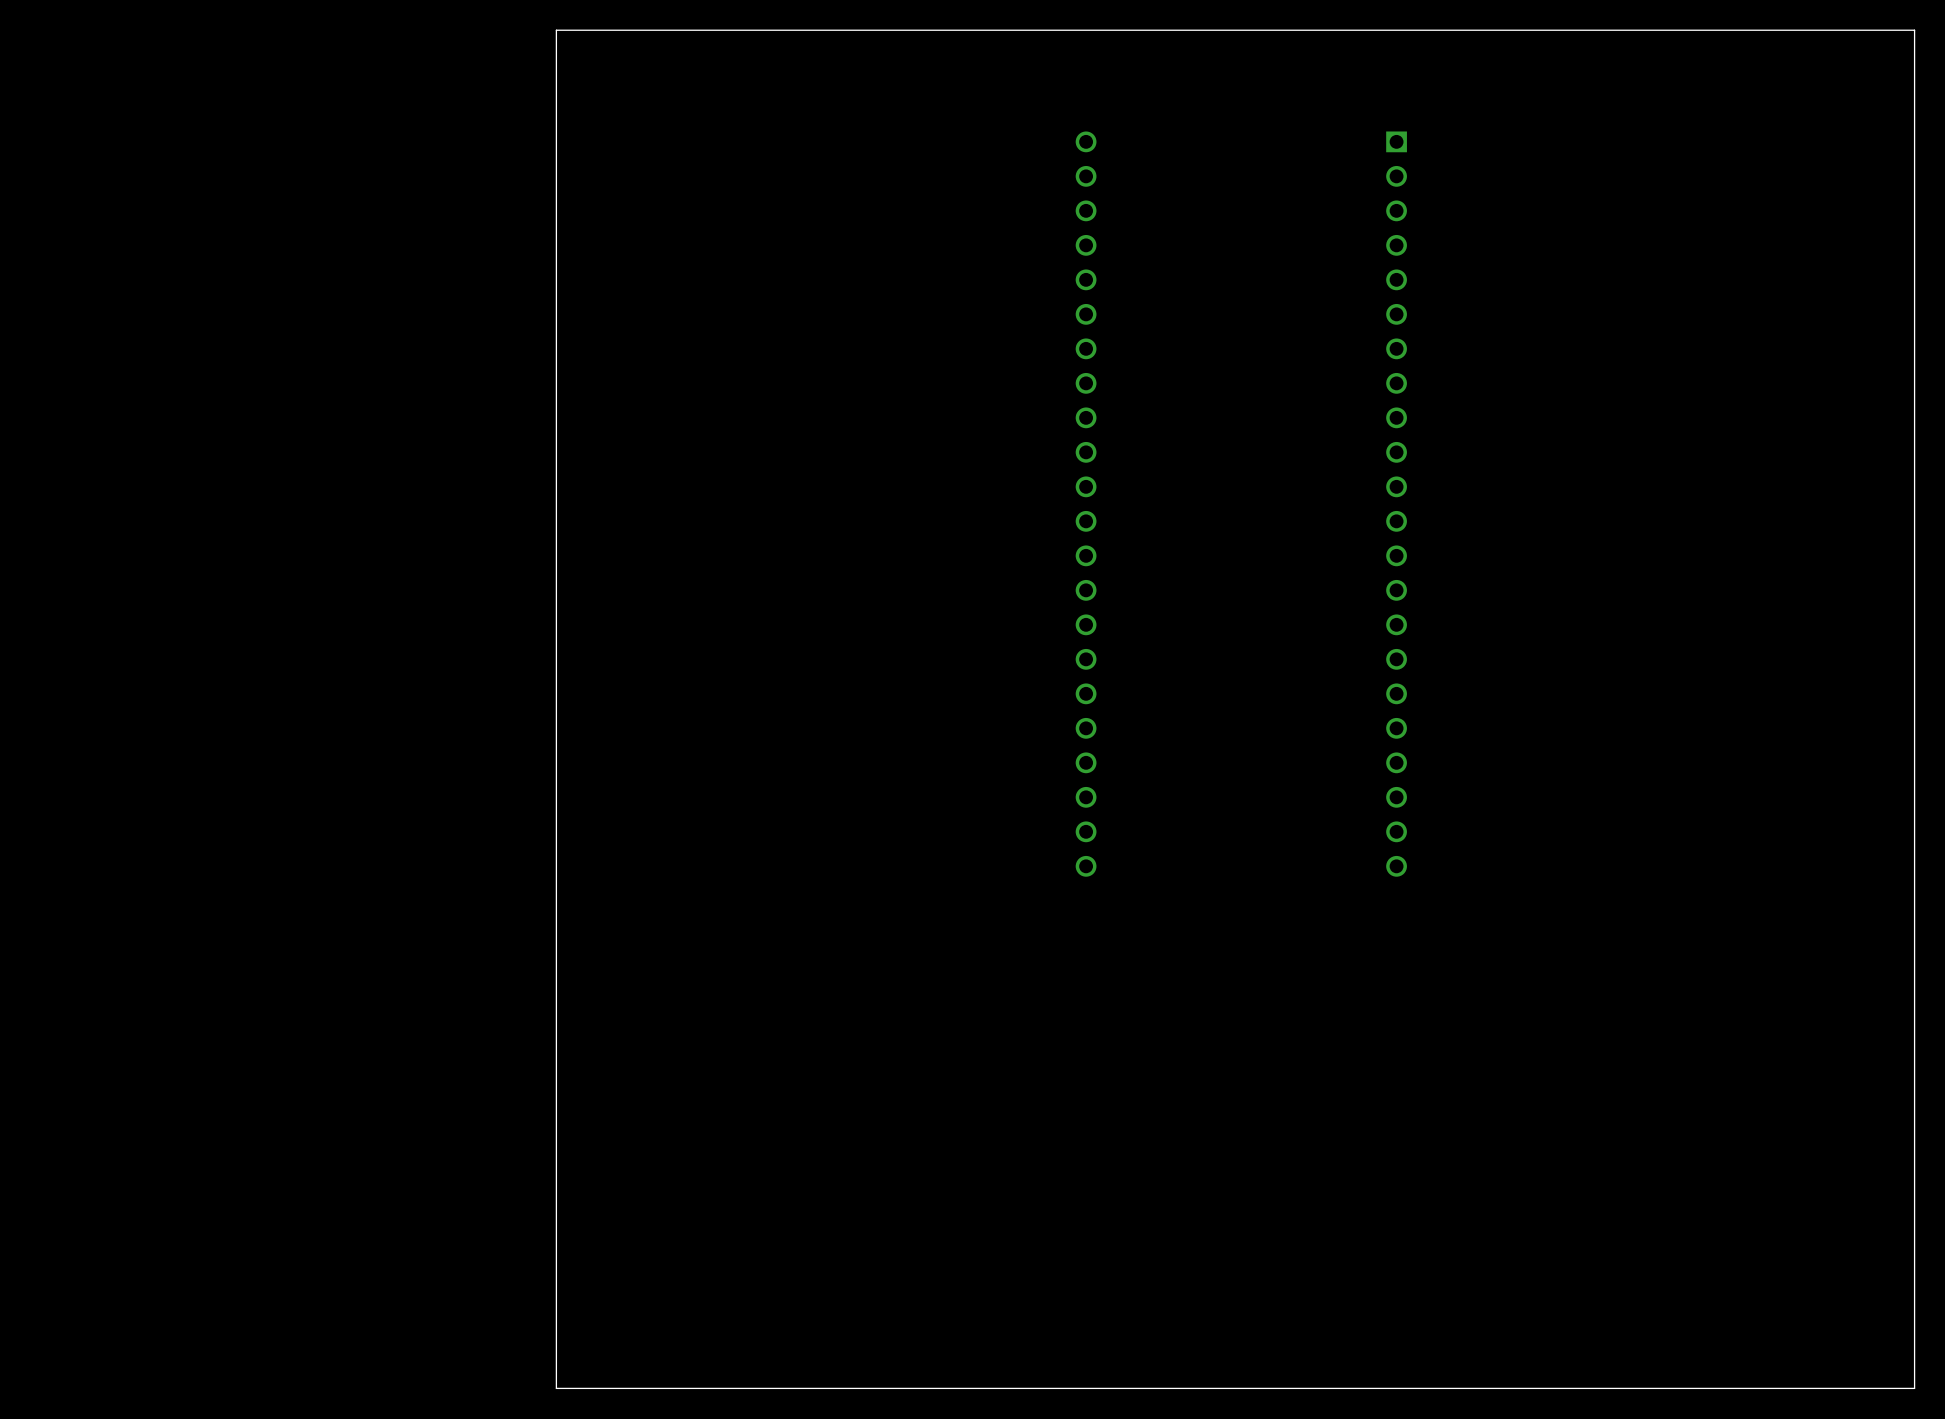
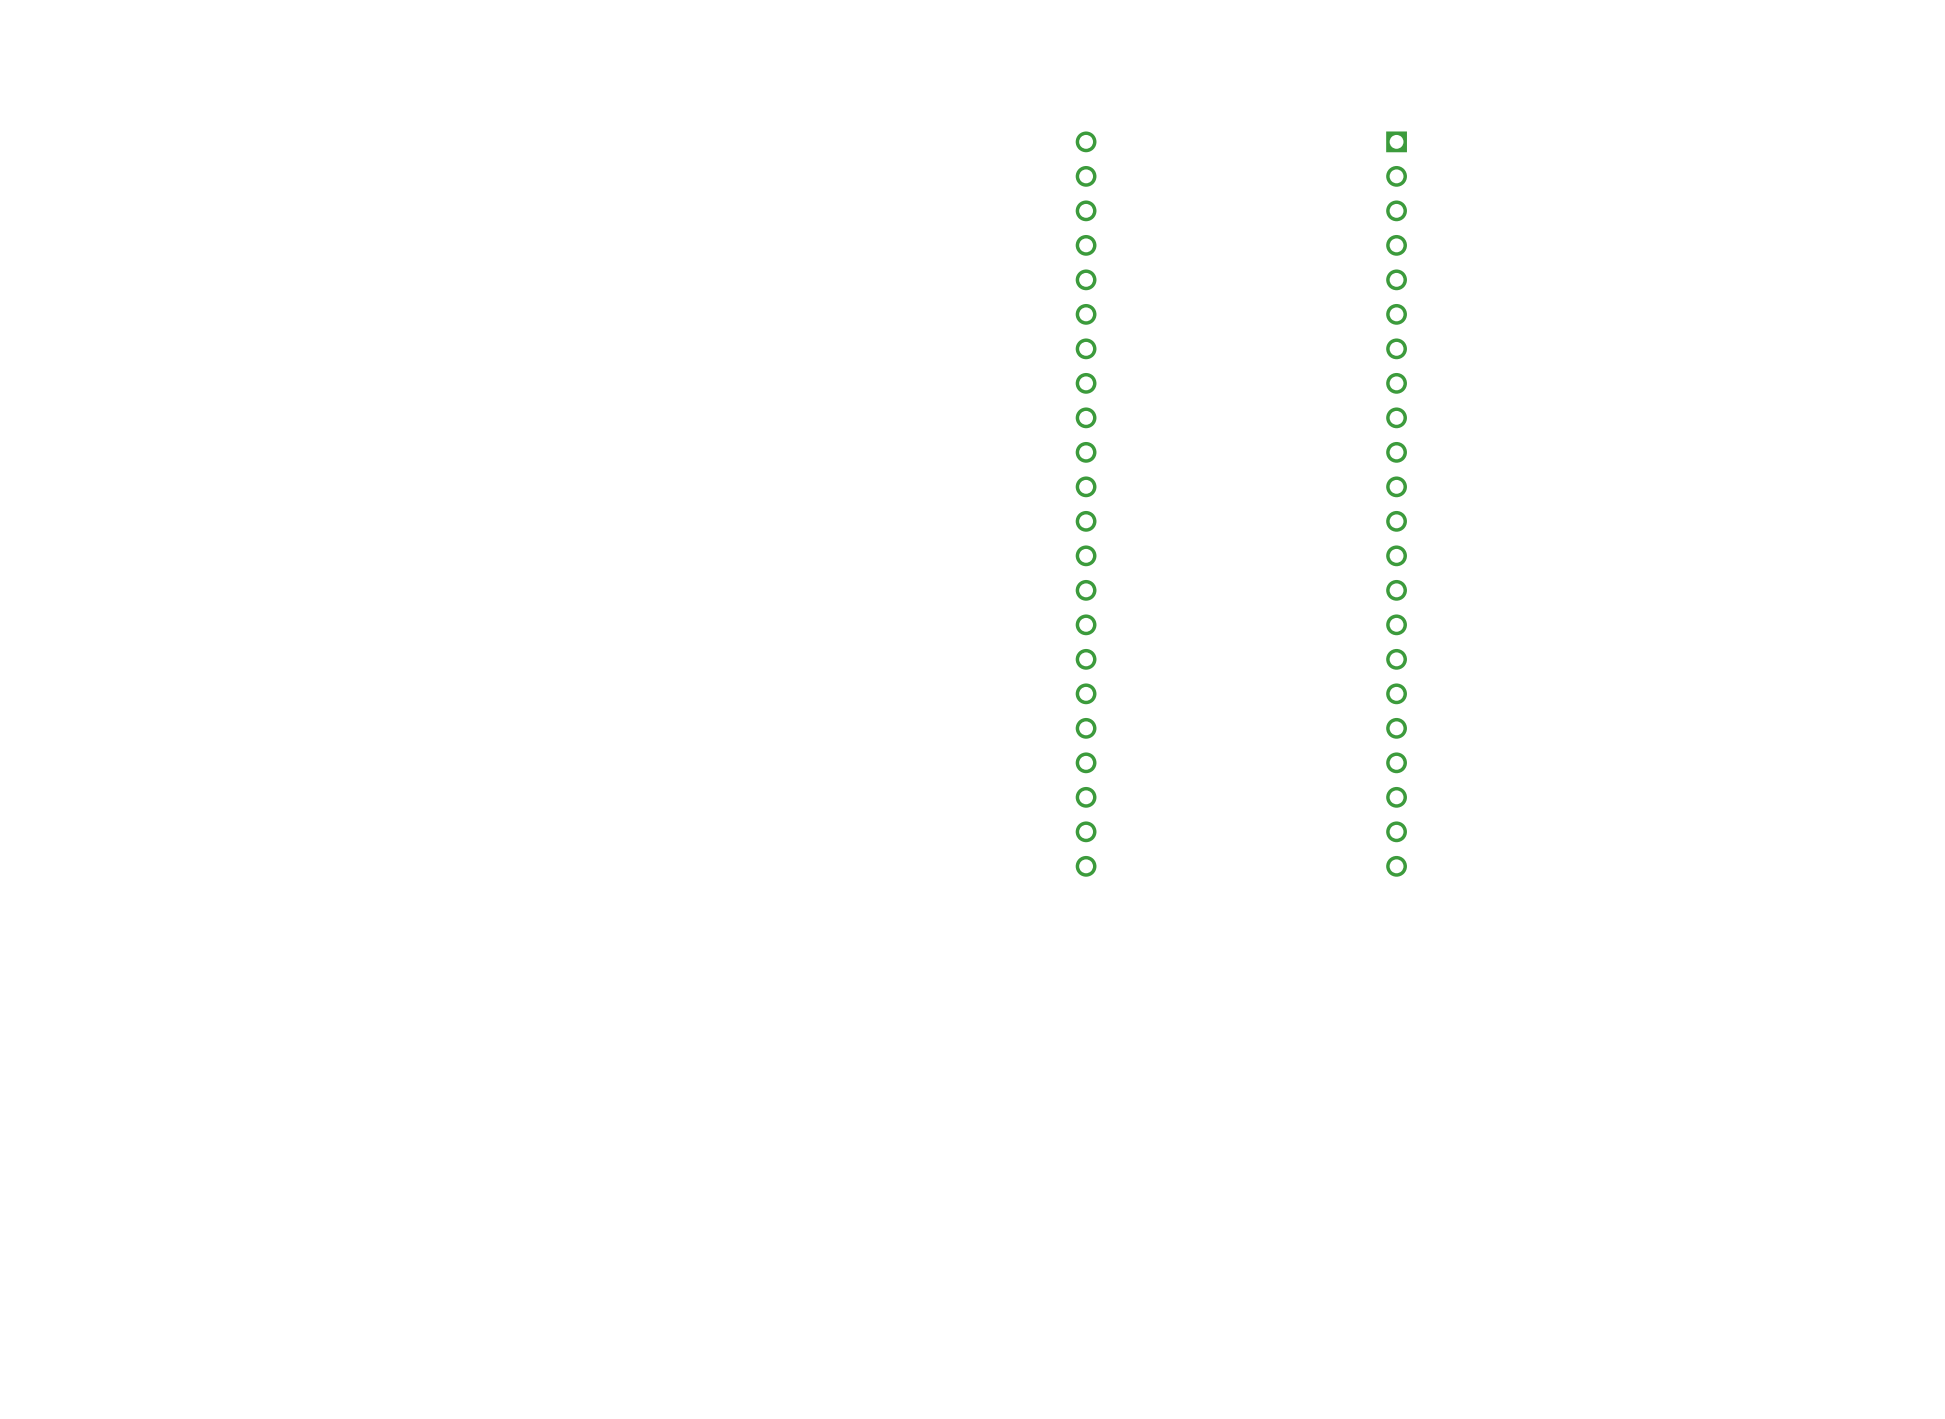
board edge: (1914, 30) (556, 30) (556, 1388) (1914, 1388) (1914, 30) -> none

